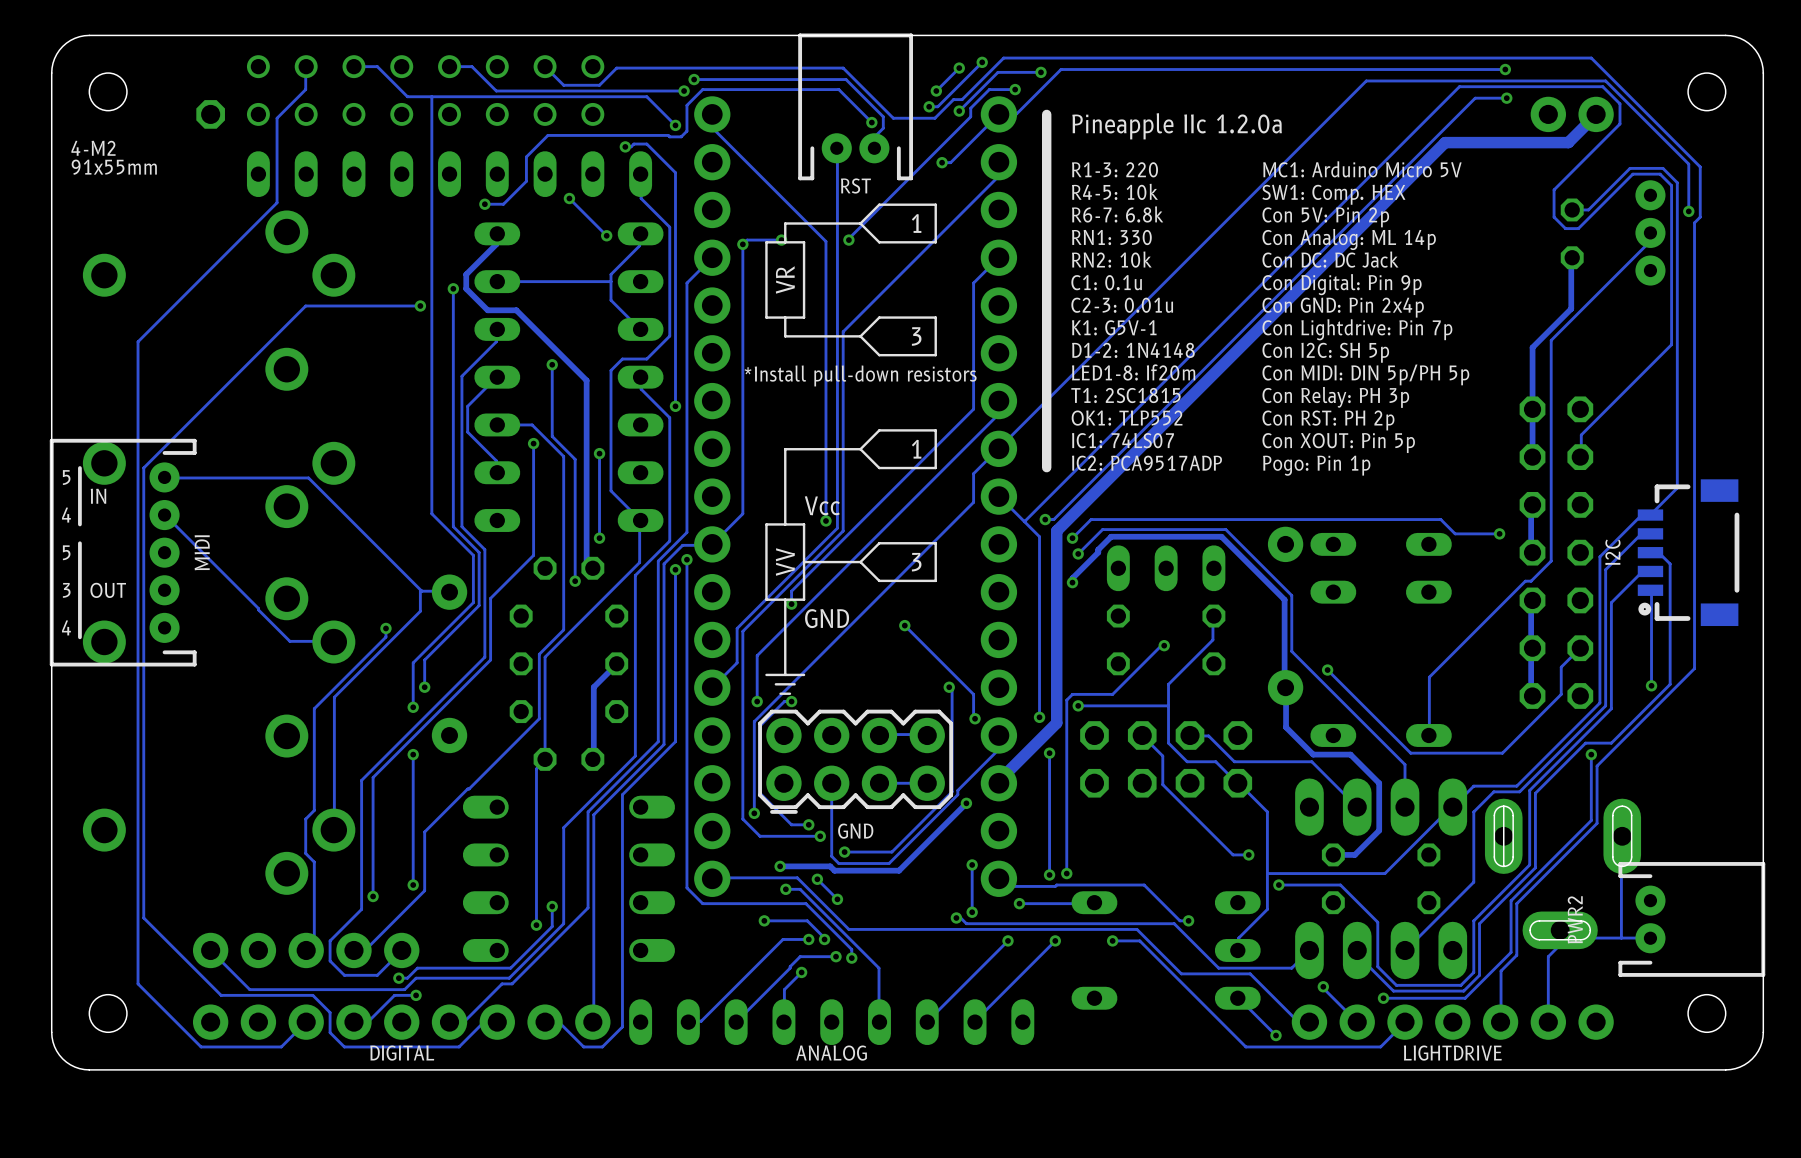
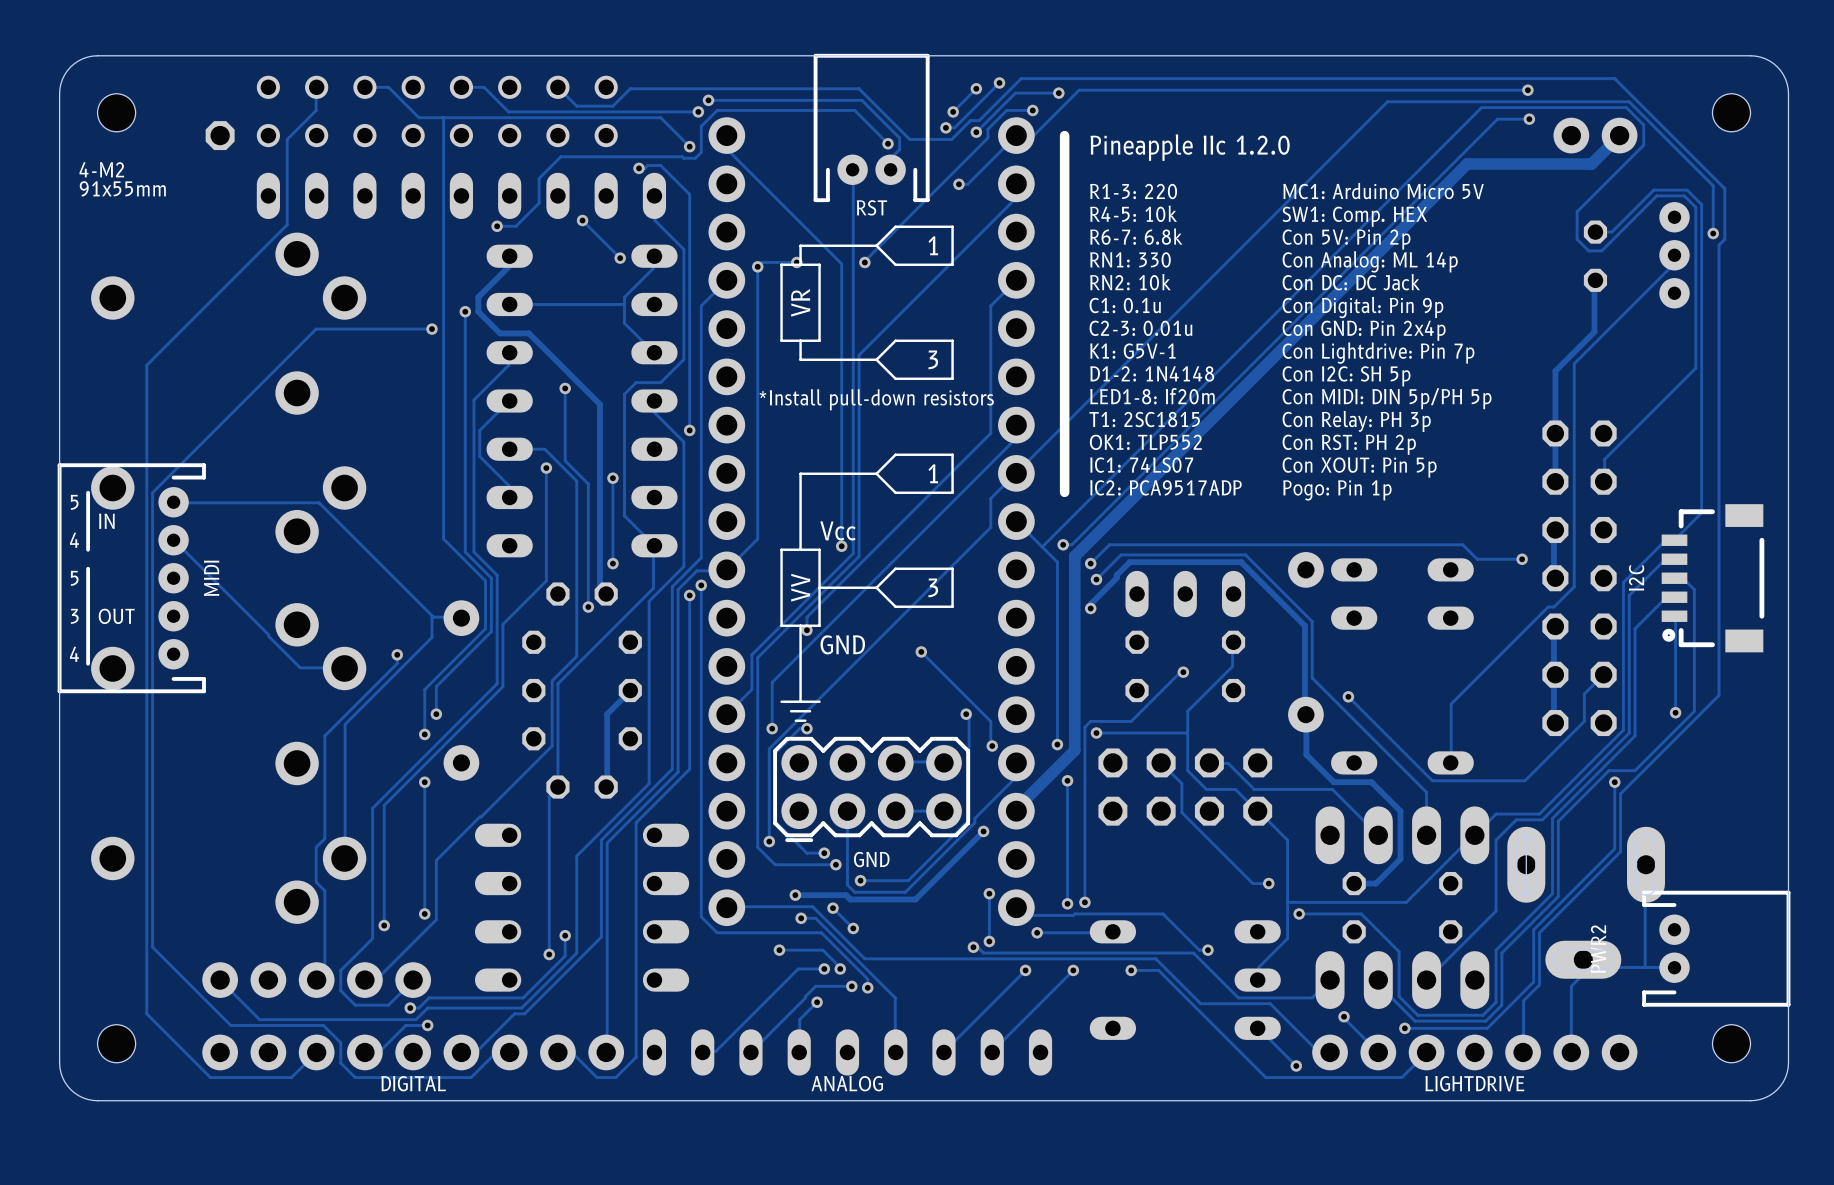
text: Pineapple IIc 1.2.0a (1177, 126) -> Pineapple IIc 1.2.0 (1190, 147)

